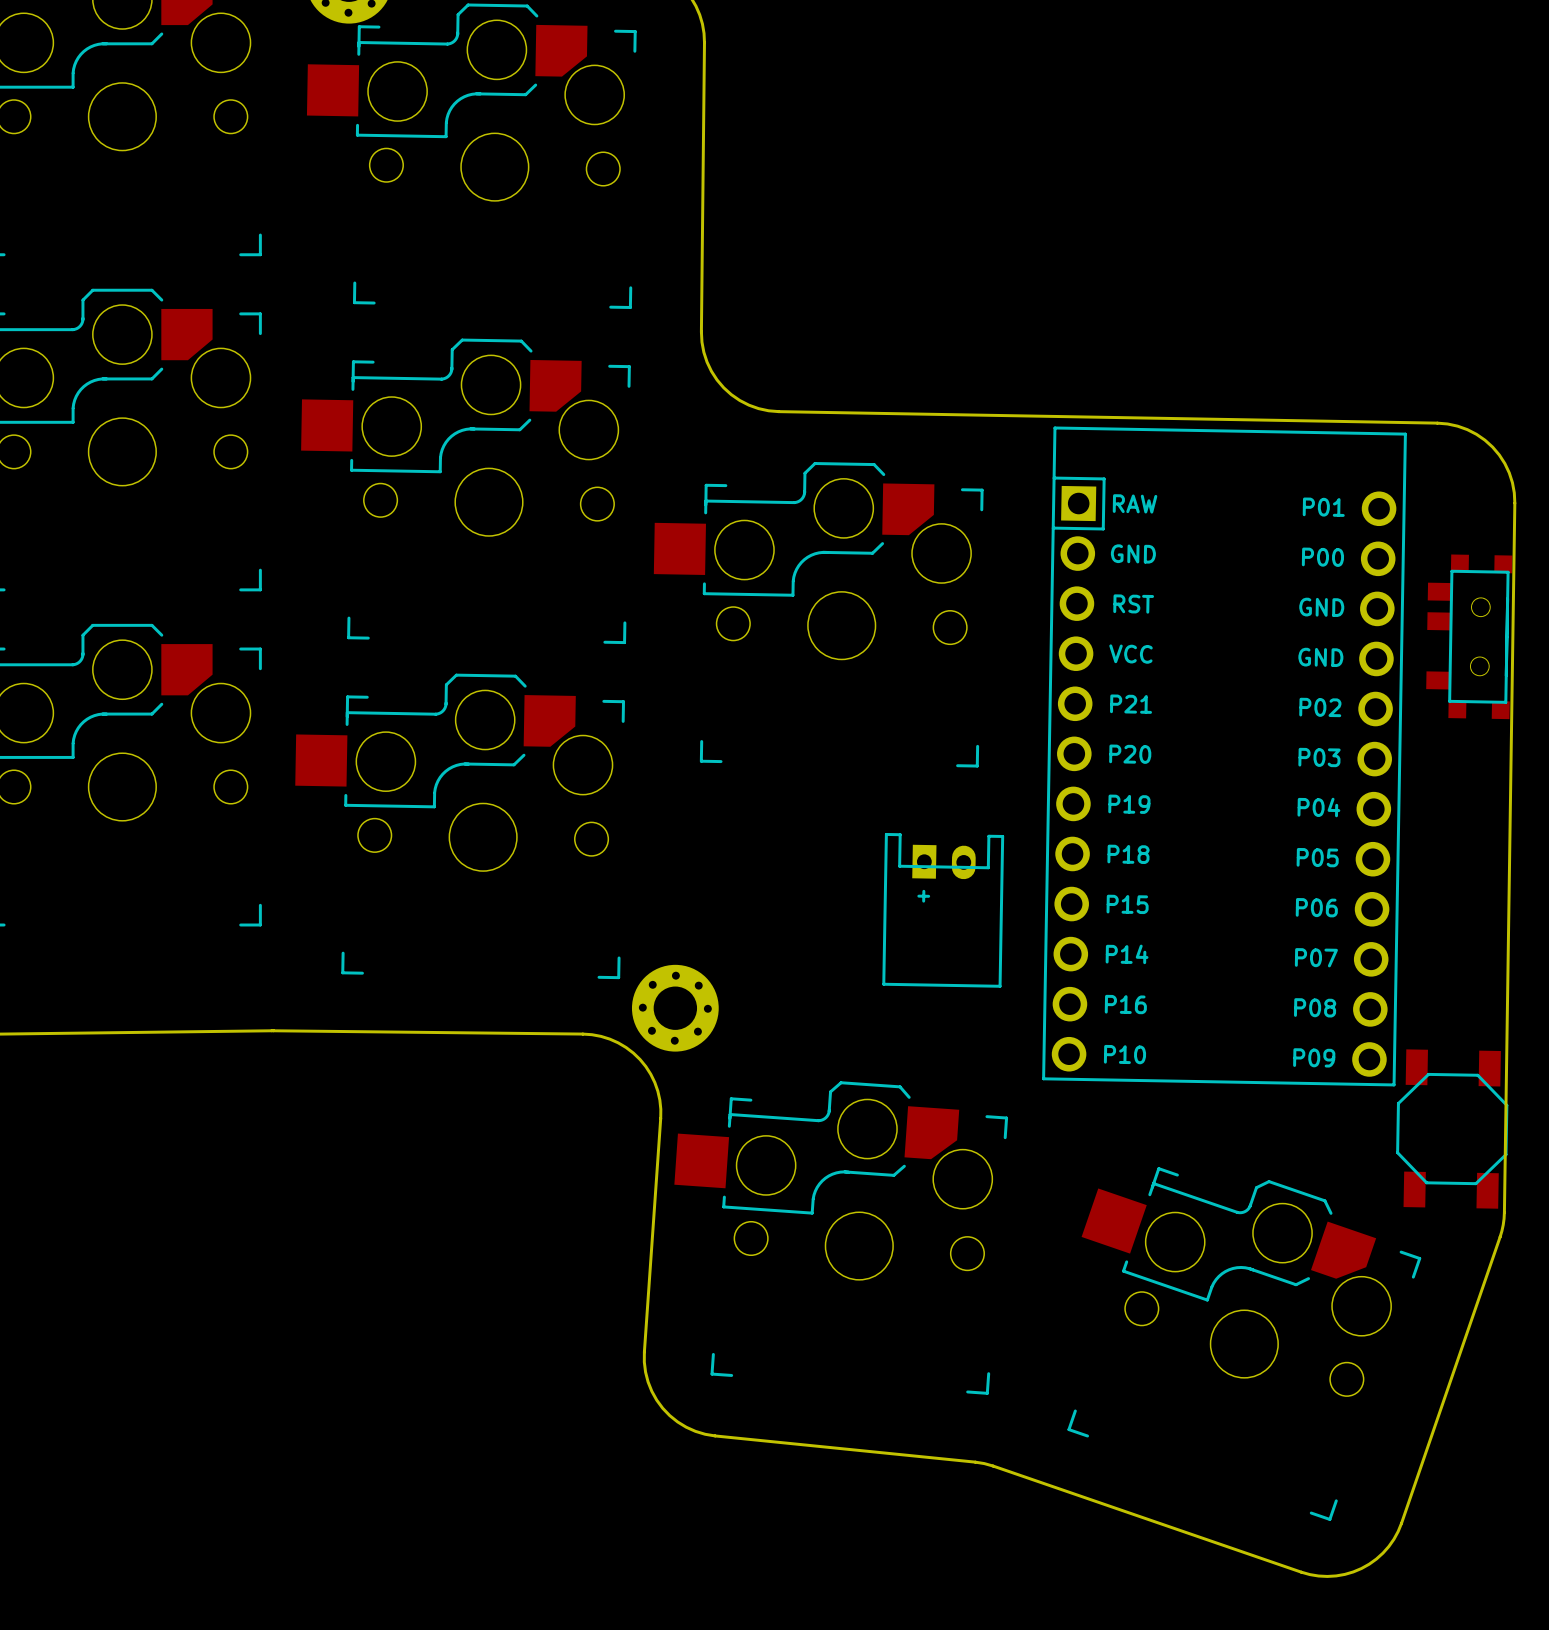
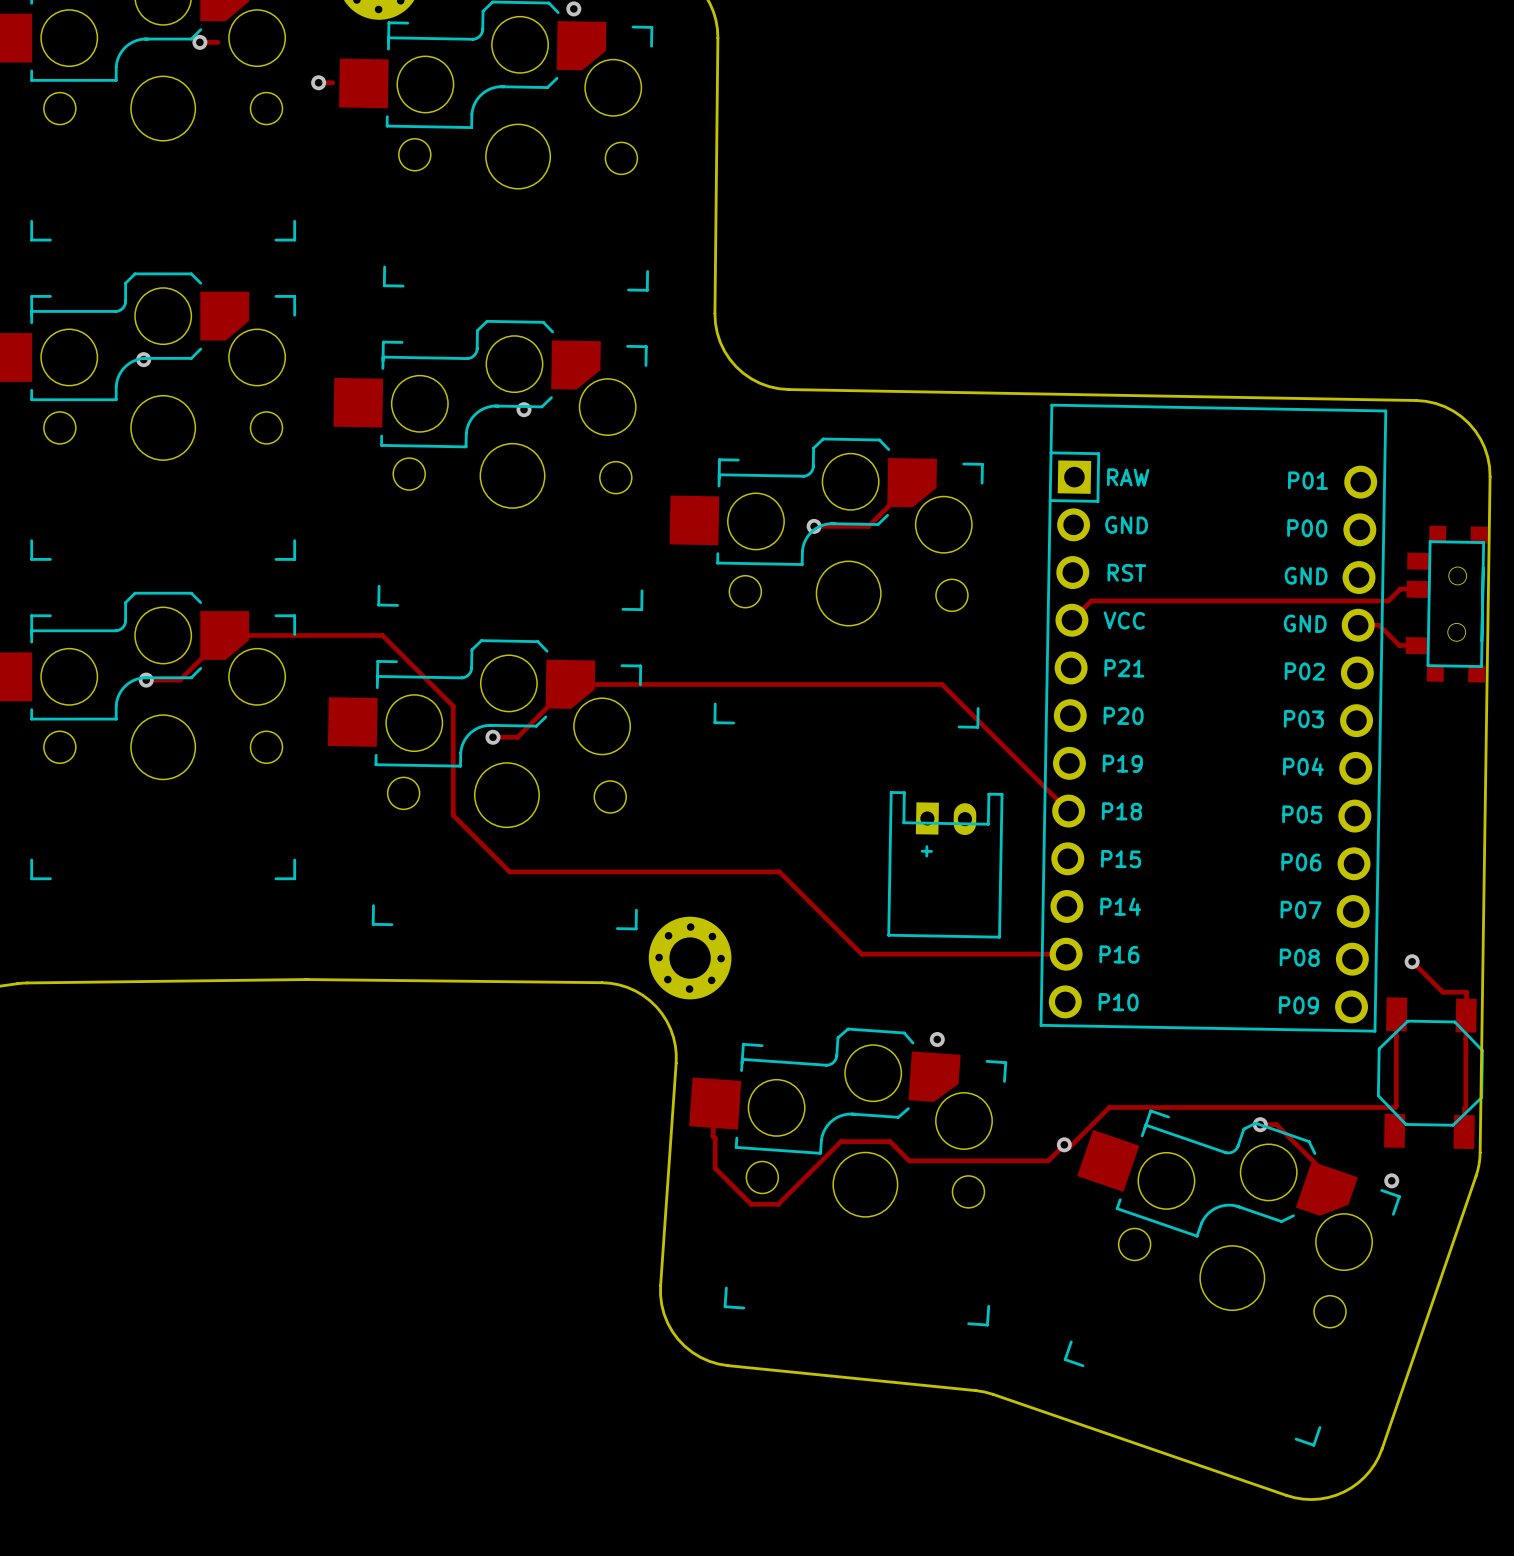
via: none -> (573, 8)
track: none -> (199, 42) (218, 42)
via: none -> (199, 42)
track: none -> (318, 82) (332, 82)
via: none -> (318, 82)
via: none -> (143, 359)
via: none -> (524, 409)
track: none -> (912, 482) (868, 526) (814, 526)
via: none -> (814, 526)
track: none -> (1418, 589) (1400, 589) (1388, 600) (1091, 600) (1071, 620)
track: none -> (1358, 625) (1379, 625) (1399, 645) (1417, 645)
track: none -> (146, 680) (180, 680) (224, 635) (382, 635) (453, 706) (453, 815) (509, 871) (779, 871) (861, 954) (1066, 954)
via: none -> (146, 680)
track: none -> (492, 737) (517, 737) (570, 684) (942, 684) (1068, 811)
via: none -> (492, 737)
track: none -> (1412, 961) (1442, 992) (1466, 992) (1464, 1132)
via: none -> (1412, 961)
track: none -> (1396, 1014) (1395, 1107) (1109, 1107) (1069, 1147) (1064, 1144) (1048, 1160) (909, 1160) (890, 1141) (841, 1141) (778, 1204) (751, 1204) (715, 1168) (715, 1138) (712, 1136) (715, 1103)
via: none -> (937, 1039)
track: none -> (1260, 1124) (1276, 1124) (1326, 1174) (1326, 1192)
via: none -> (1260, 1124)
via: none -> (1064, 1144)
via: none -> (1391, 1180)

